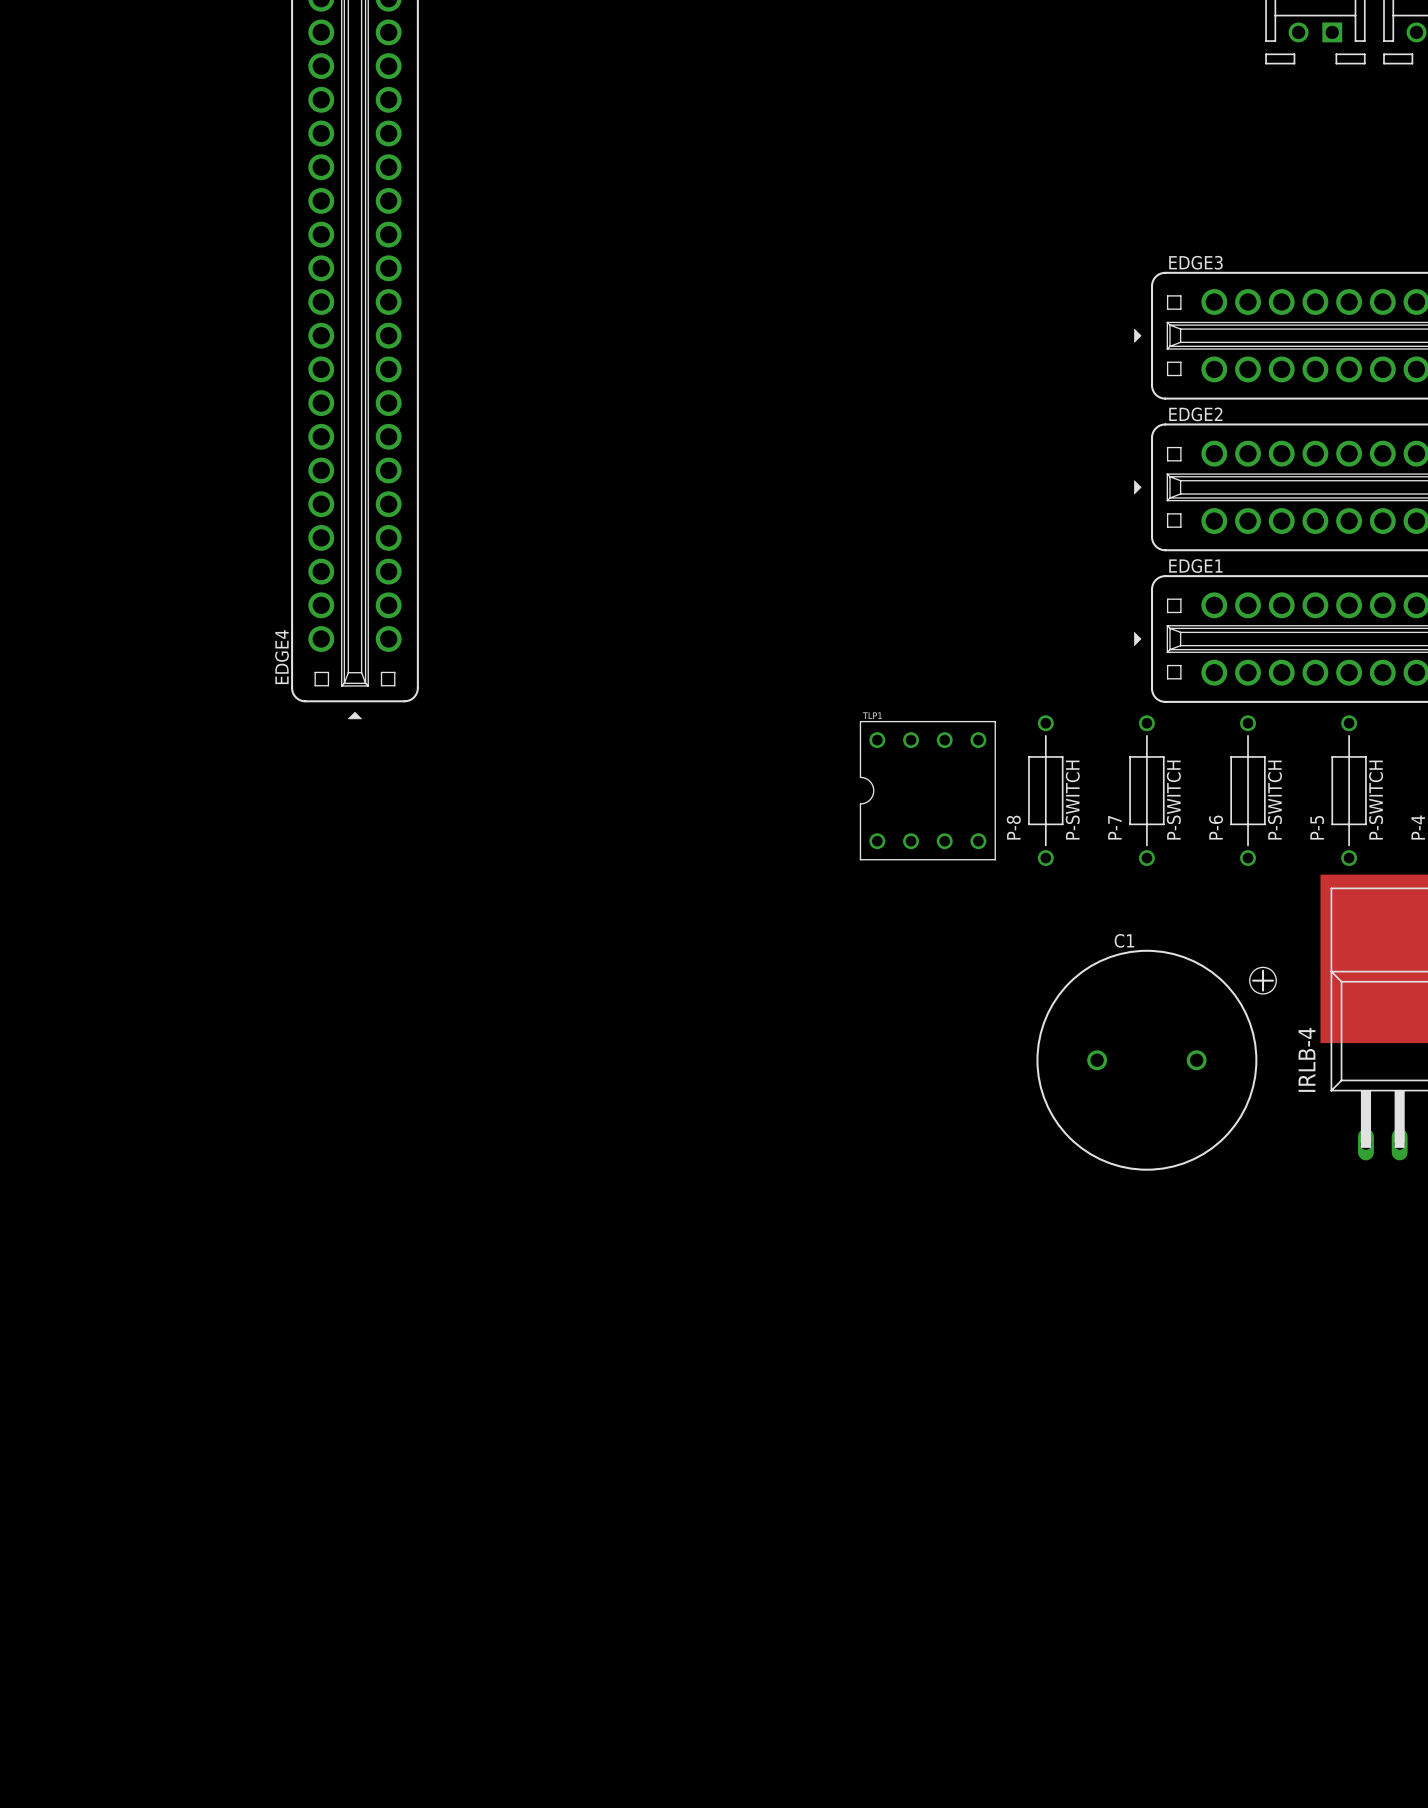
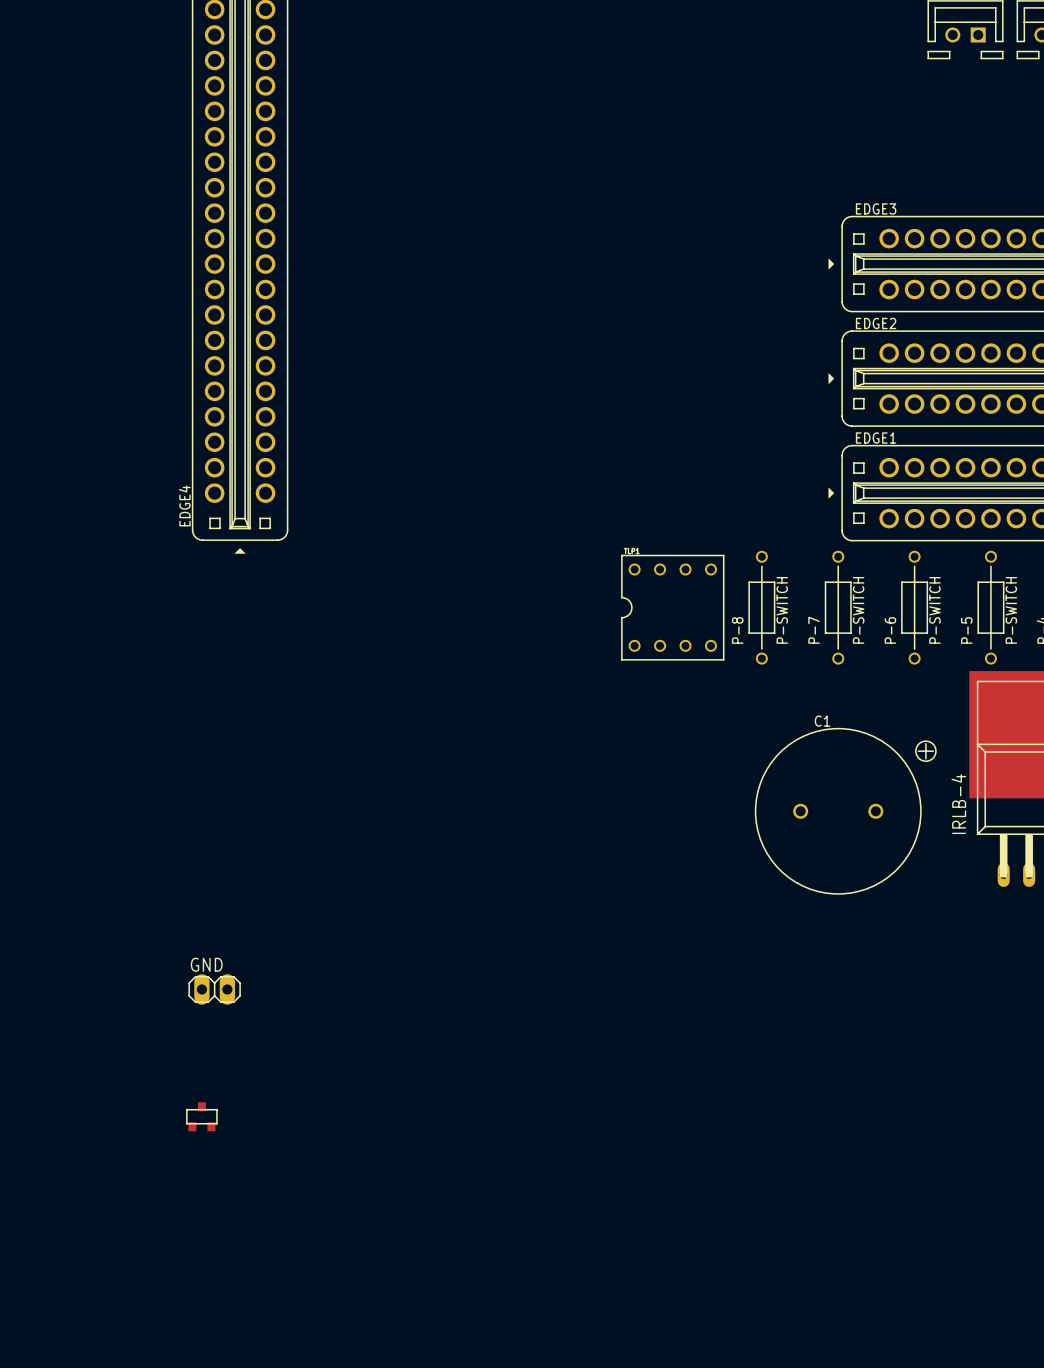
GND: none -> (214, 989)
part: none -> (201, 1116)

